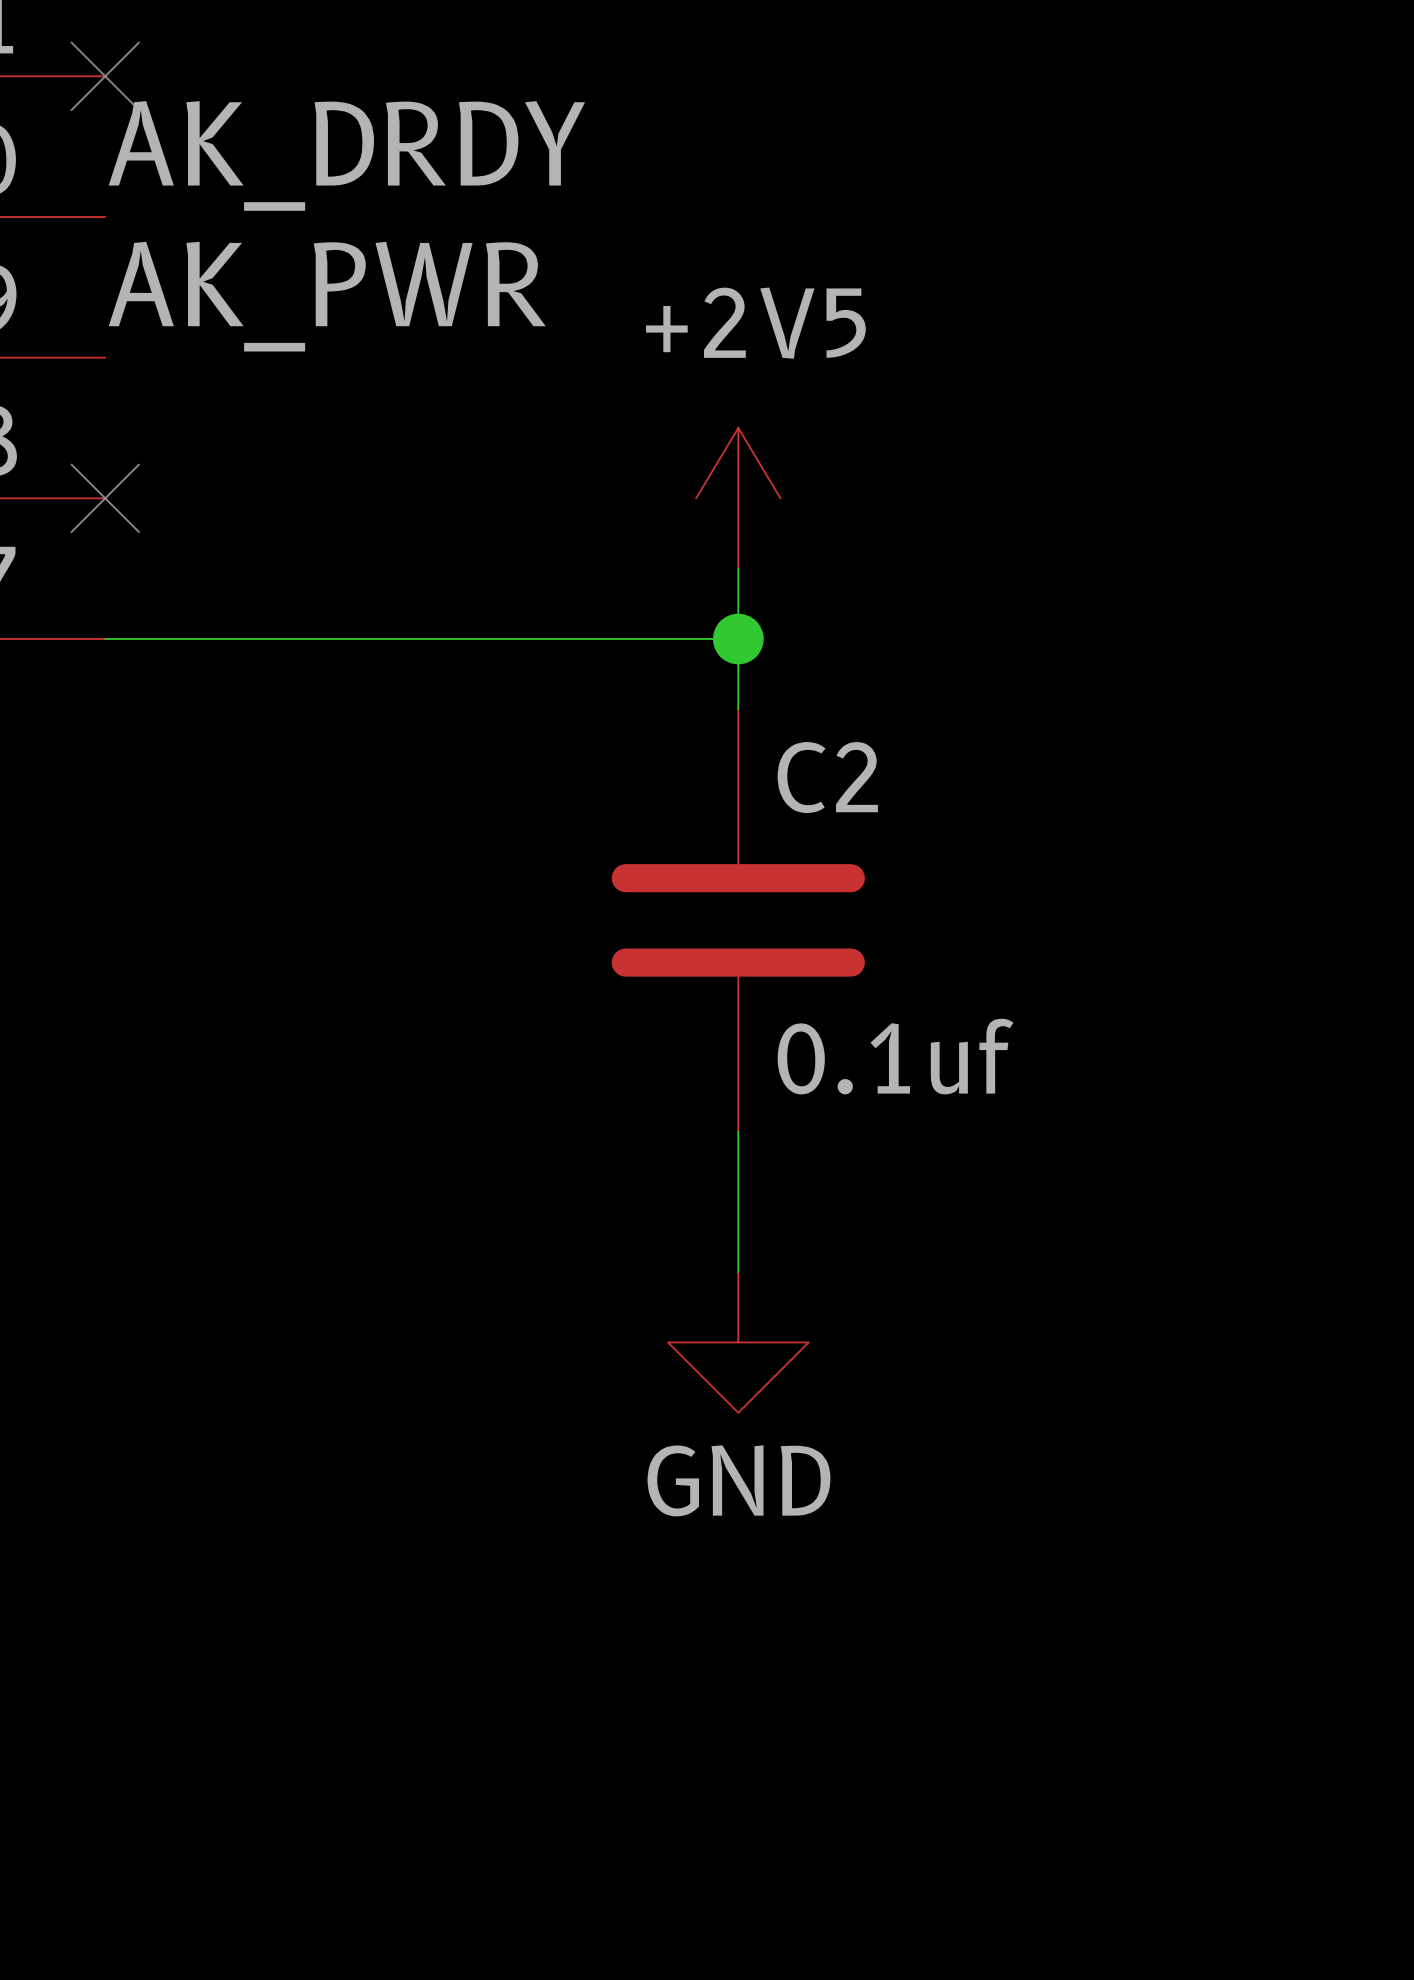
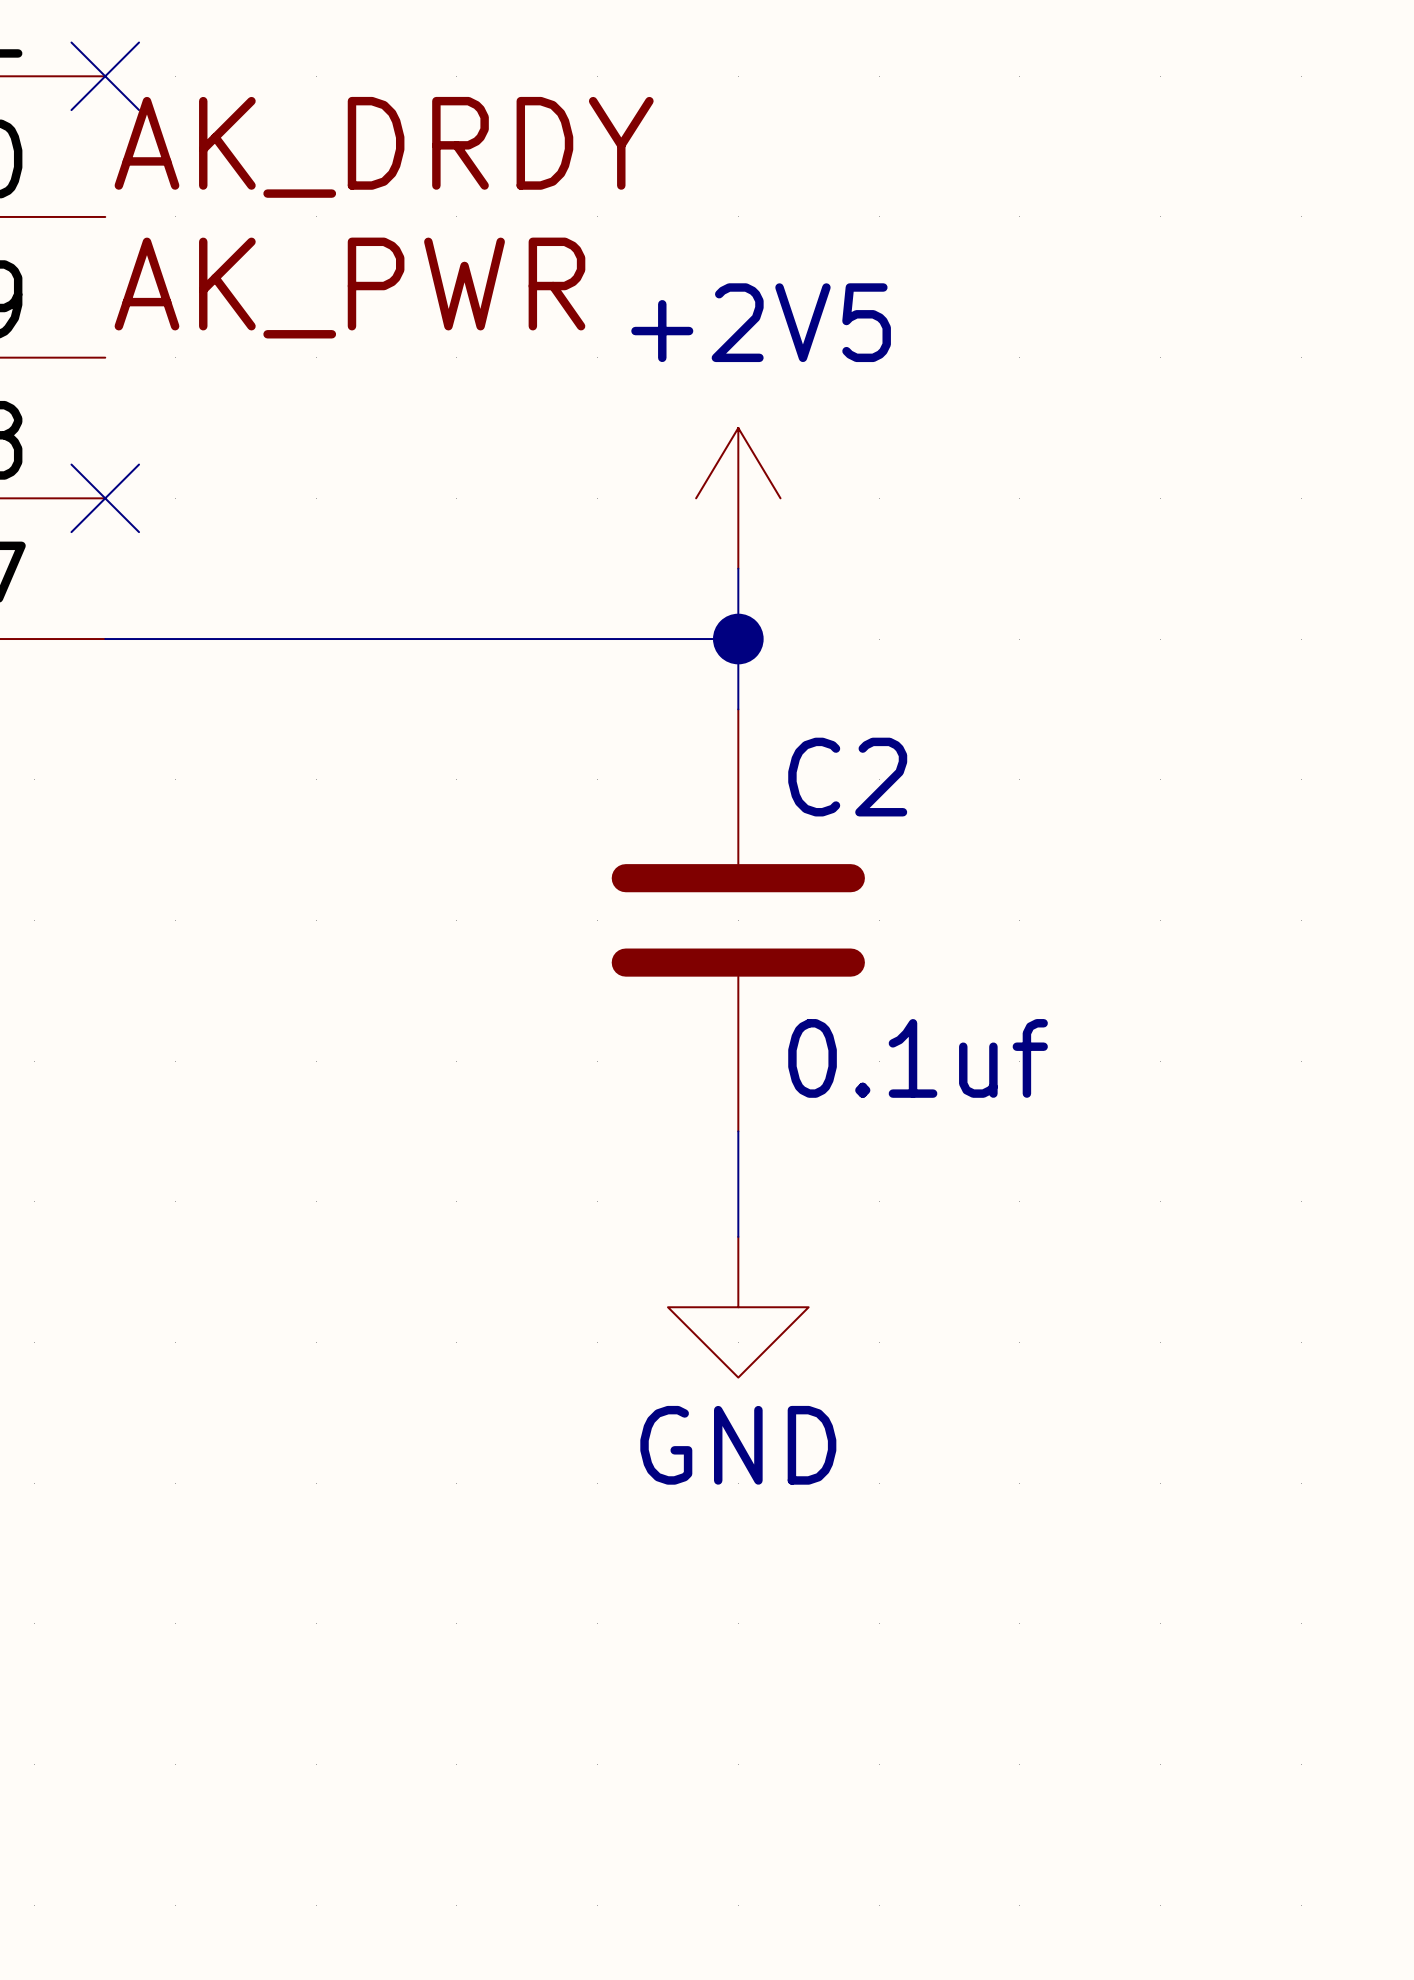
power symbol position: GND (738, 1342) -> GND (738, 1307)

